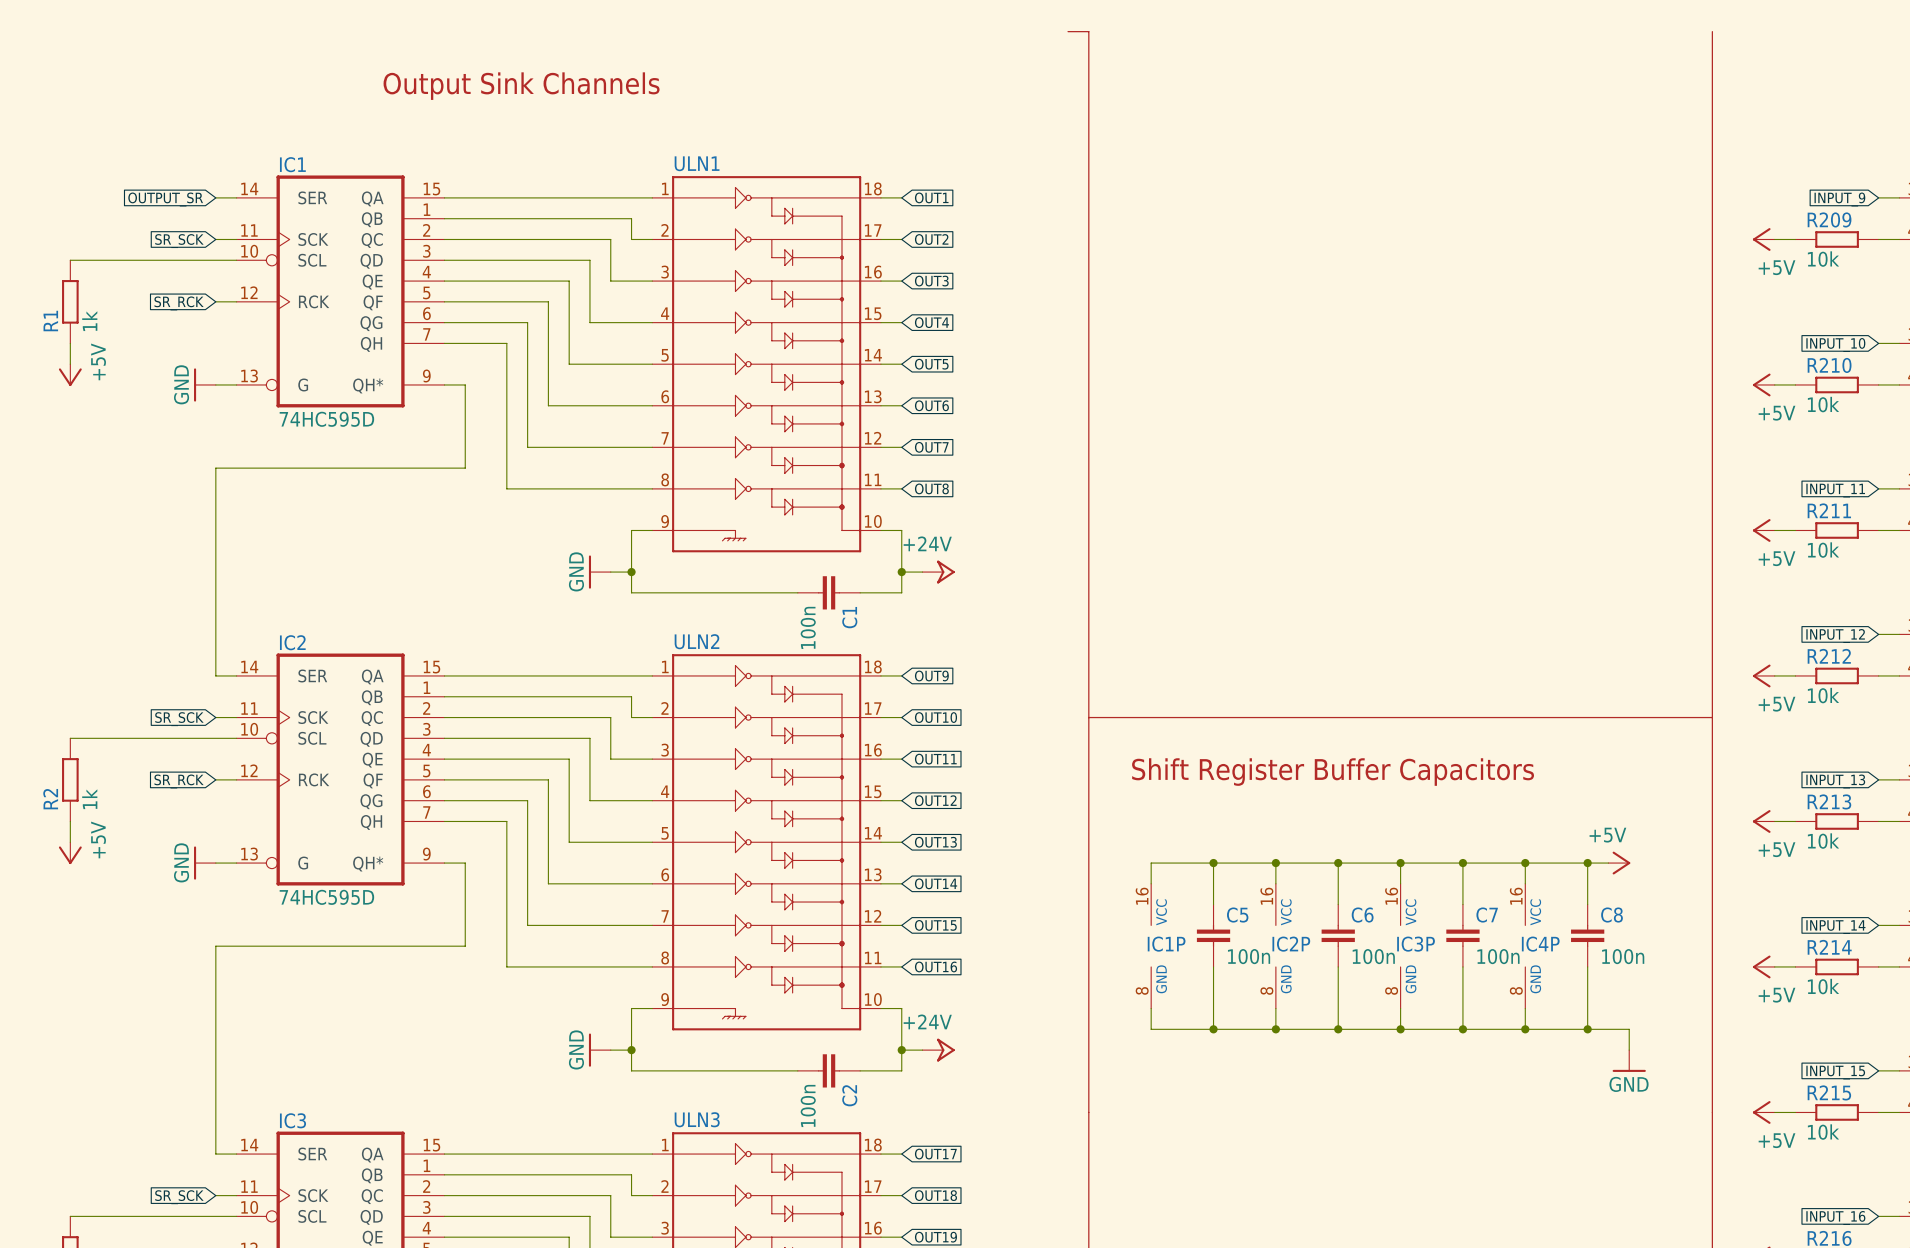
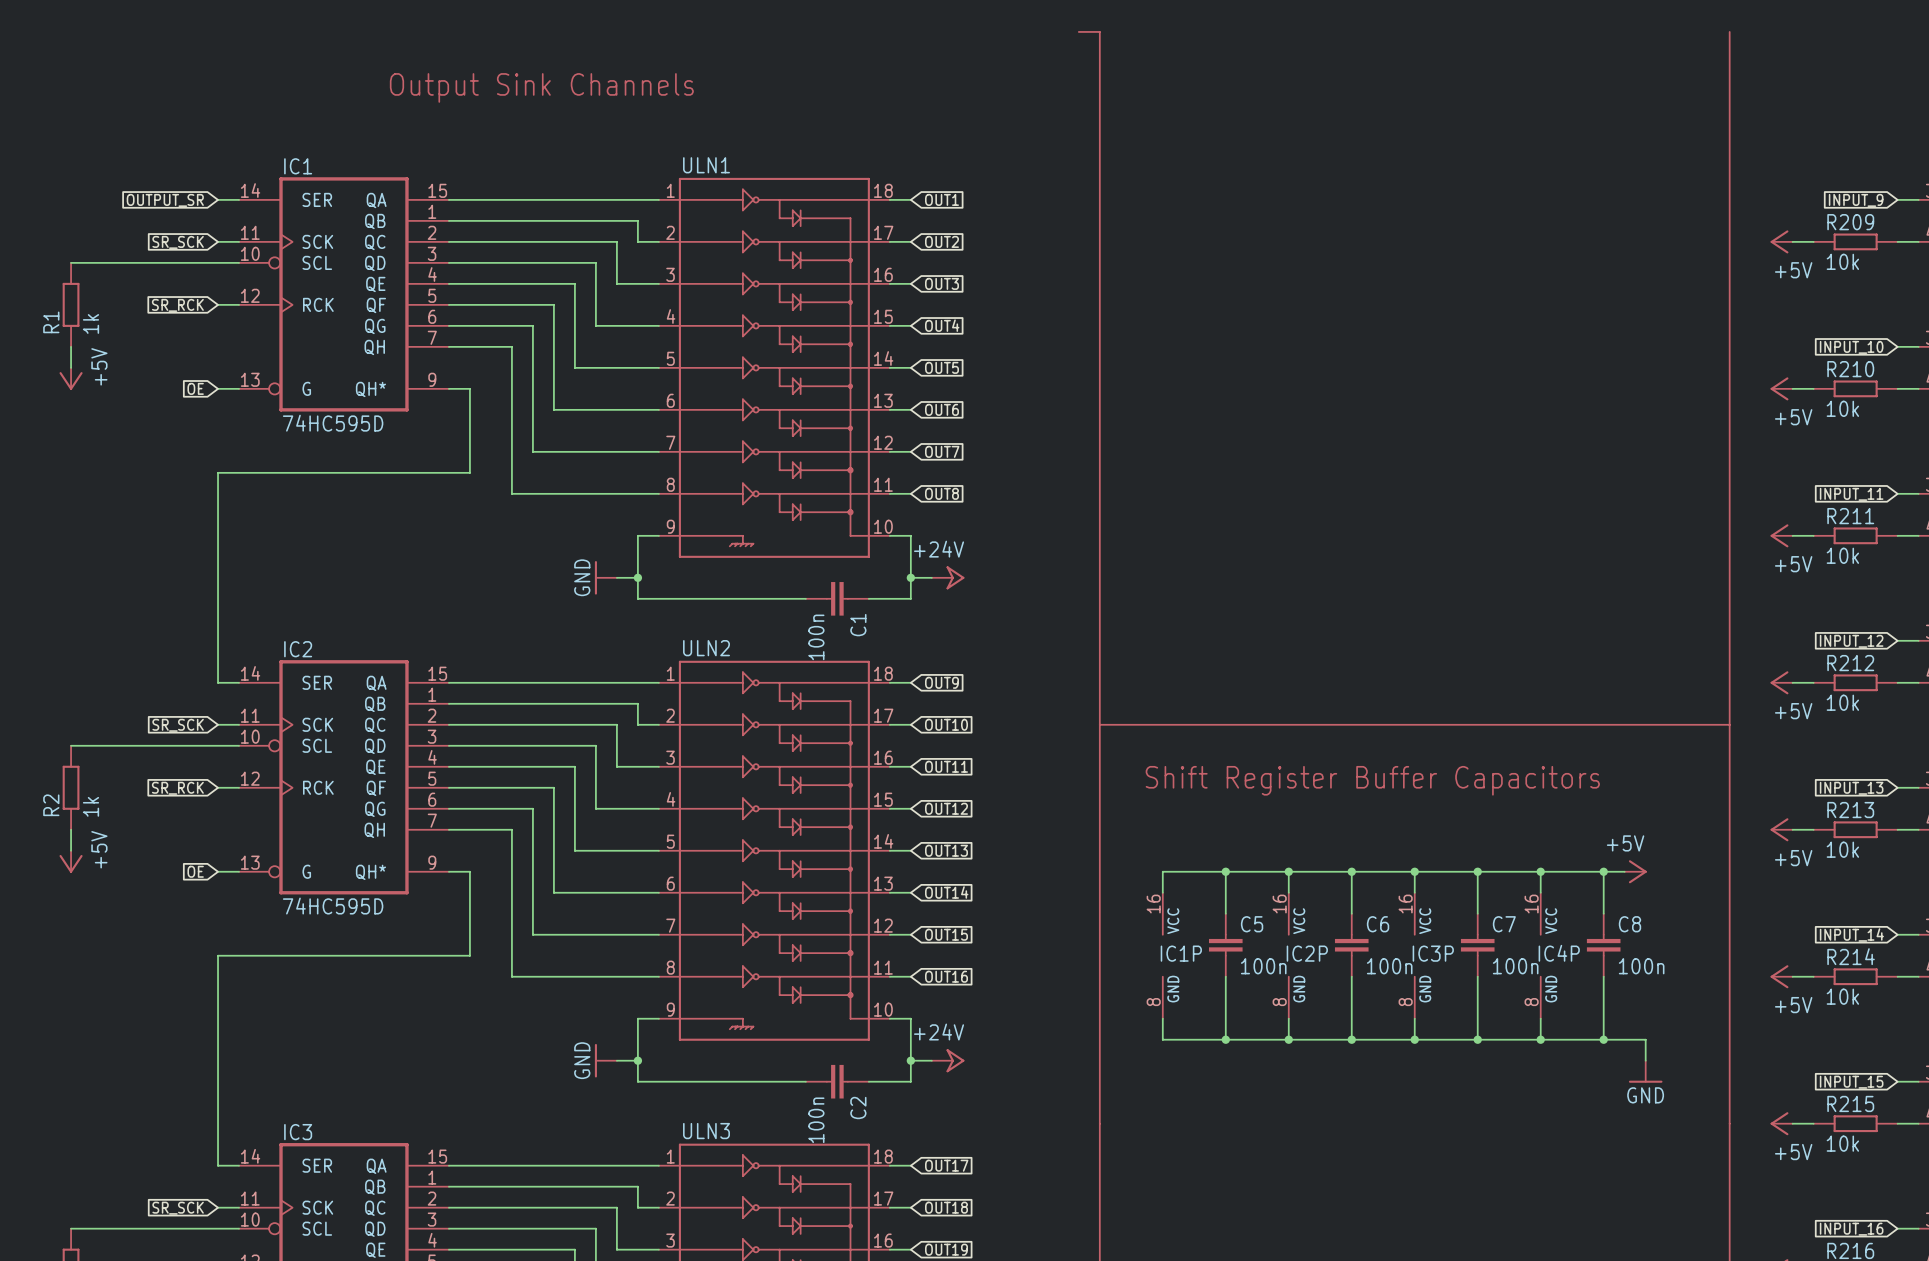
global label: none -> OE (195, 388)
power symbol: GND (204, 384) -> none
global label: none -> OE (195, 871)
power symbol: GND (204, 863) -> none

